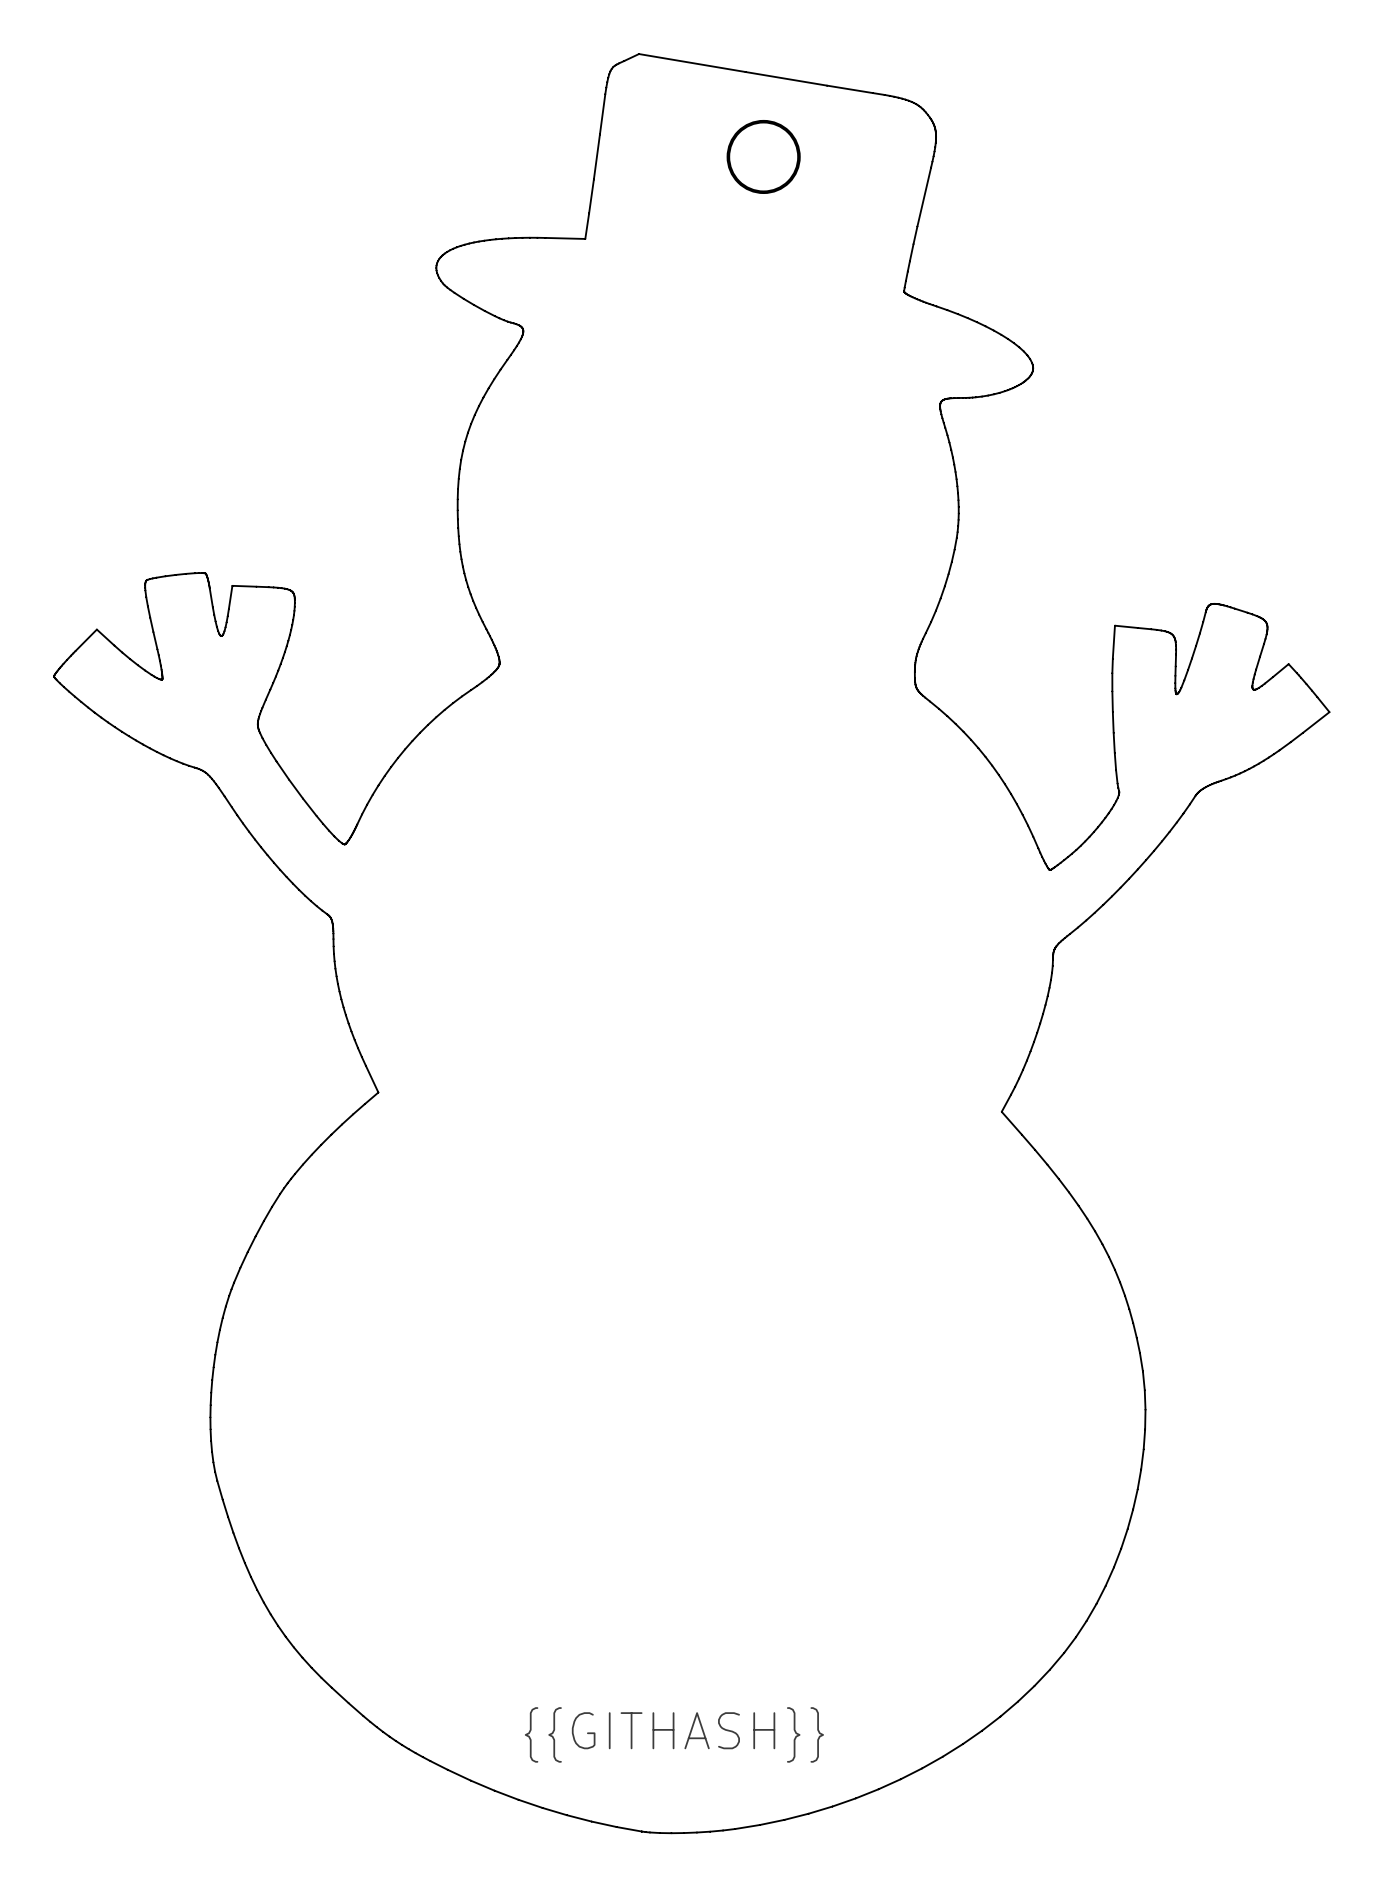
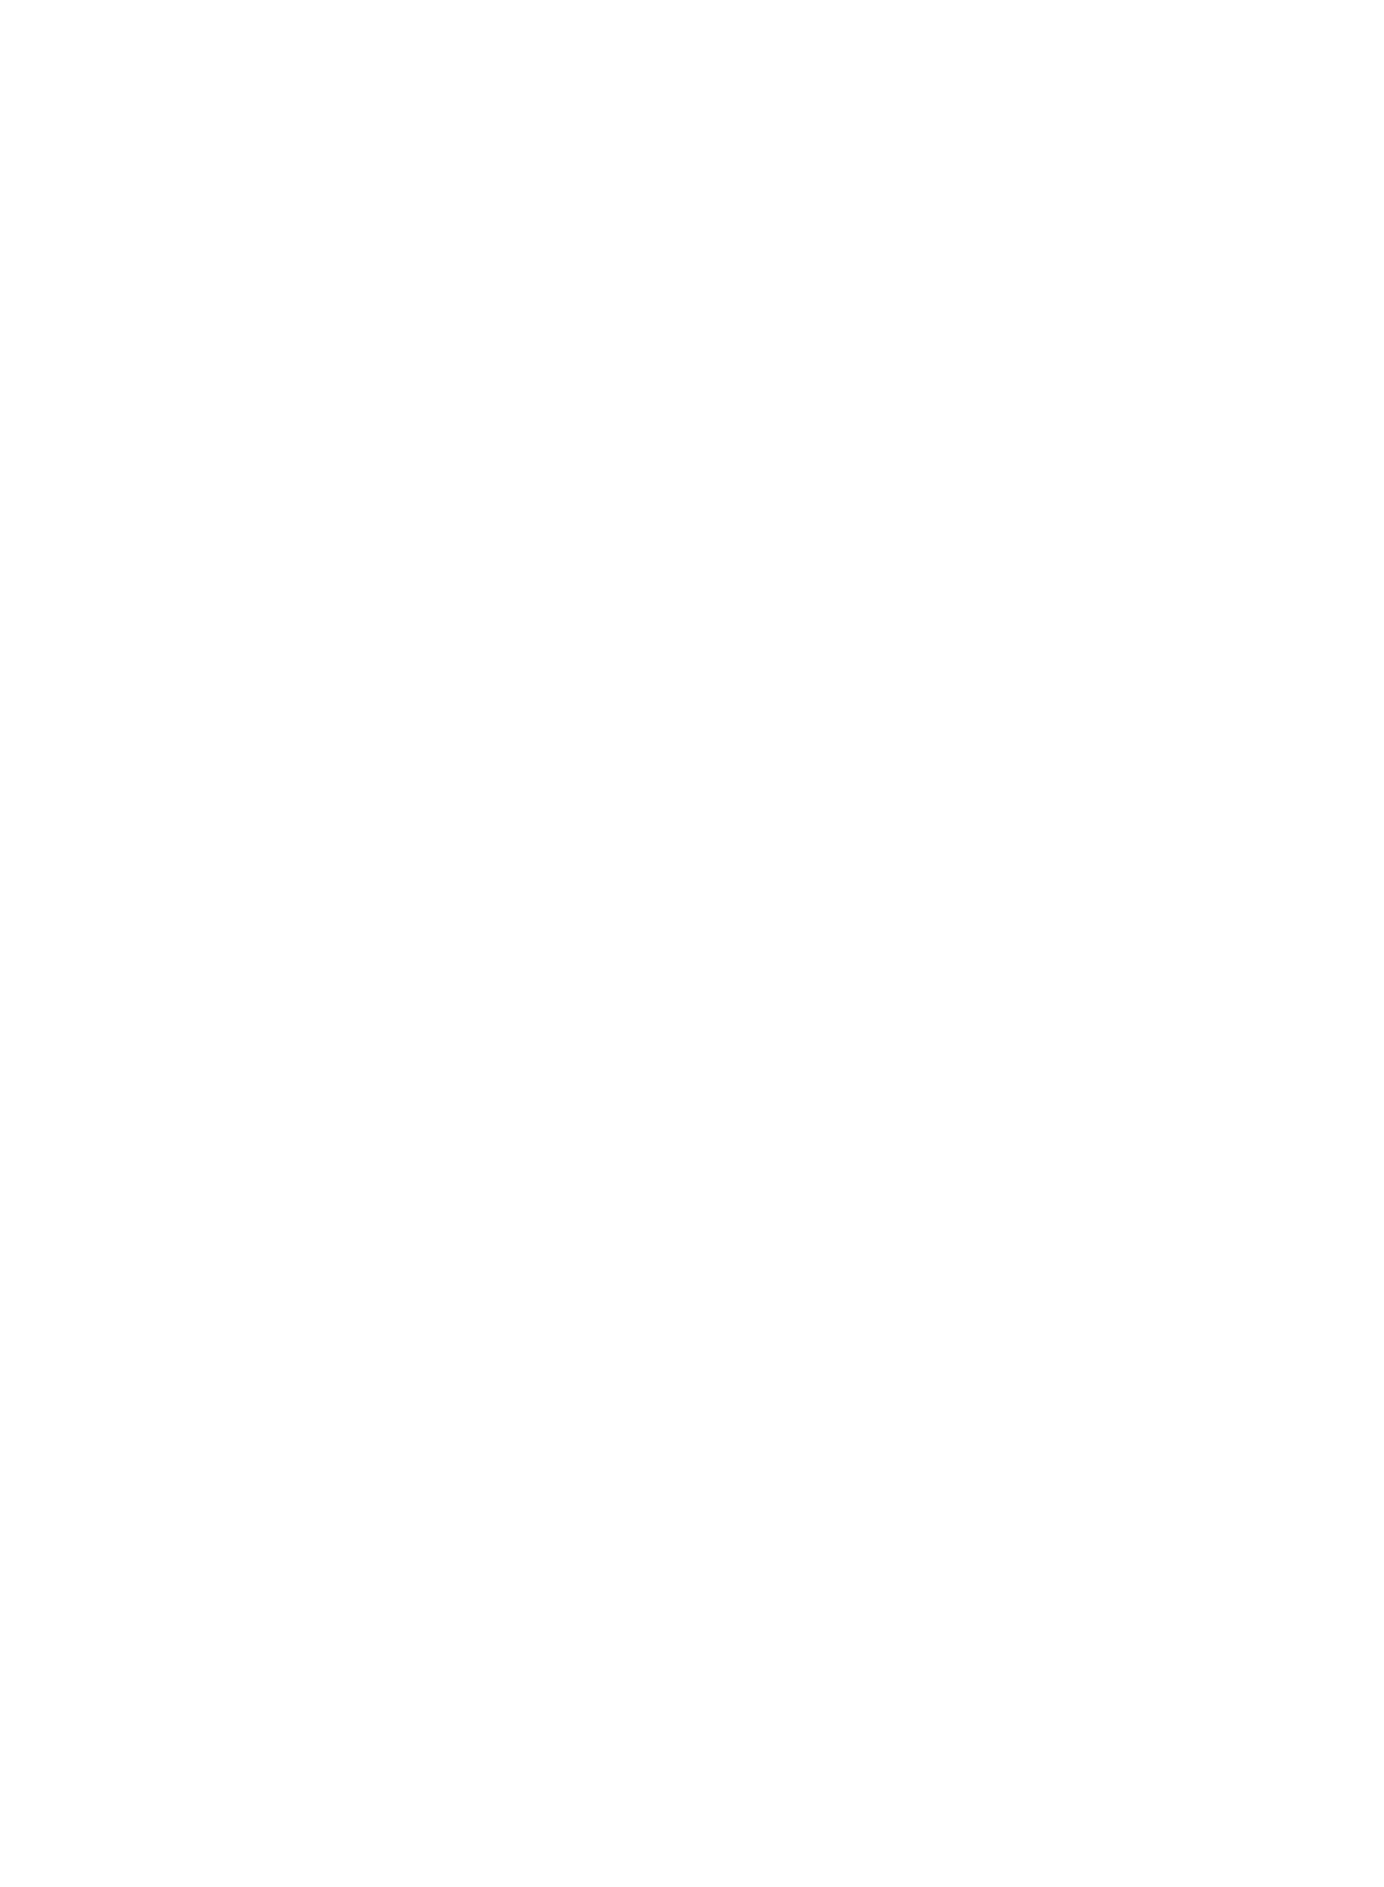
round board edge: [726, 119, 801, 195] -> none
board edge: (904, 291) (935, 141) (933, 123) (920, 107) (908, 100) (889, 95) (639, 54) (613, 67) (606, 87) (585, 238) (522, 237) (479, 241) (450, 250) (440, 257) (437, 263) (437, 275) (447, 287) (484, 310) (519, 325) (523, 330) (518, 342) (488, 388) (474, 415) (465, 441) (458, 478) (458, 528) (462, 566) (470, 593) (495, 648) (499, 663) (488, 676) (436, 717) (405, 749) (378, 785) (345, 844) -> none
board edge: (904, 292) (914, 298) (967, 318) (993, 330) (1019, 347) (1027, 355) (1032, 364) (1032, 371) (1028, 377) (1010, 389) (982, 396) (946, 398) (940, 402) (940, 411) (956, 479) (958, 526) (954, 549) (944, 586) (917, 653) (914, 677) (916, 686) (919, 692) (963, 731) (998, 774) (1022, 814) (1049, 870) -> none
board edge: (205, 573) (175, 574) (145, 581) (146, 597) (162, 679) -> none
board edge: (206, 574) (216, 626) (221, 636) (225, 627) (232, 585) (281, 588) (289, 589) (293, 593) (294, 610) (289, 635) (280, 664) (260, 714) (258, 727) (270, 752) (302, 798) (329, 830) (344, 844) -> none
board edge: (54, 675) (96, 629) (137, 665) (161, 679) -> none
board edge: (54, 676) (81, 702) (121, 731) (163, 755) (206, 773) (273, 862) (305, 895) (329, 916) (333, 926) (336, 976) (343, 1007) (358, 1048) (378, 1092) (321, 1144) (280, 1193) (263, 1221) (240, 1267) (229, 1295) (219, 1330) (213, 1367) (210, 1405) (213, 1462) (233, 1533) (250, 1576) (263, 1602) (285, 1636) (321, 1677) (376, 1727) (415, 1753) (470, 1780) (542, 1807) (616, 1827) (645, 1832) (671, 1833) (735, 1829) (808, 1813) (878, 1789) (942, 1756) (1000, 1716) (1049, 1669) (1086, 1621) (1113, 1567) (1133, 1509) (1143, 1449) (1144, 1390) (1139, 1352) (1133, 1323) (1114, 1269) (1087, 1218) (1047, 1164) (1001, 1111) (1023, 1069) (1037, 1032) (1047, 996) (1053, 952) (1056, 945) (1103, 904) (1137, 869) (1169, 831) (1199, 791) (1263, 760) (1329, 712) (1288, 664) (1261, 686) (1253, 689) (1253, 679) (1267, 632) (1266, 623) (1256, 615) (1217, 604) (1210, 604) (1207, 608) (1187, 670) (1176, 694) -> none
board edge: (1176, 693) (1176, 645) (1172, 634) (1161, 630) (1114, 625) (1112, 711) (1118, 795) (1108, 813) (1089, 836) (1072, 853) (1050, 870) -> none
text: {{GITHASH}} (674, 1734) -> none

